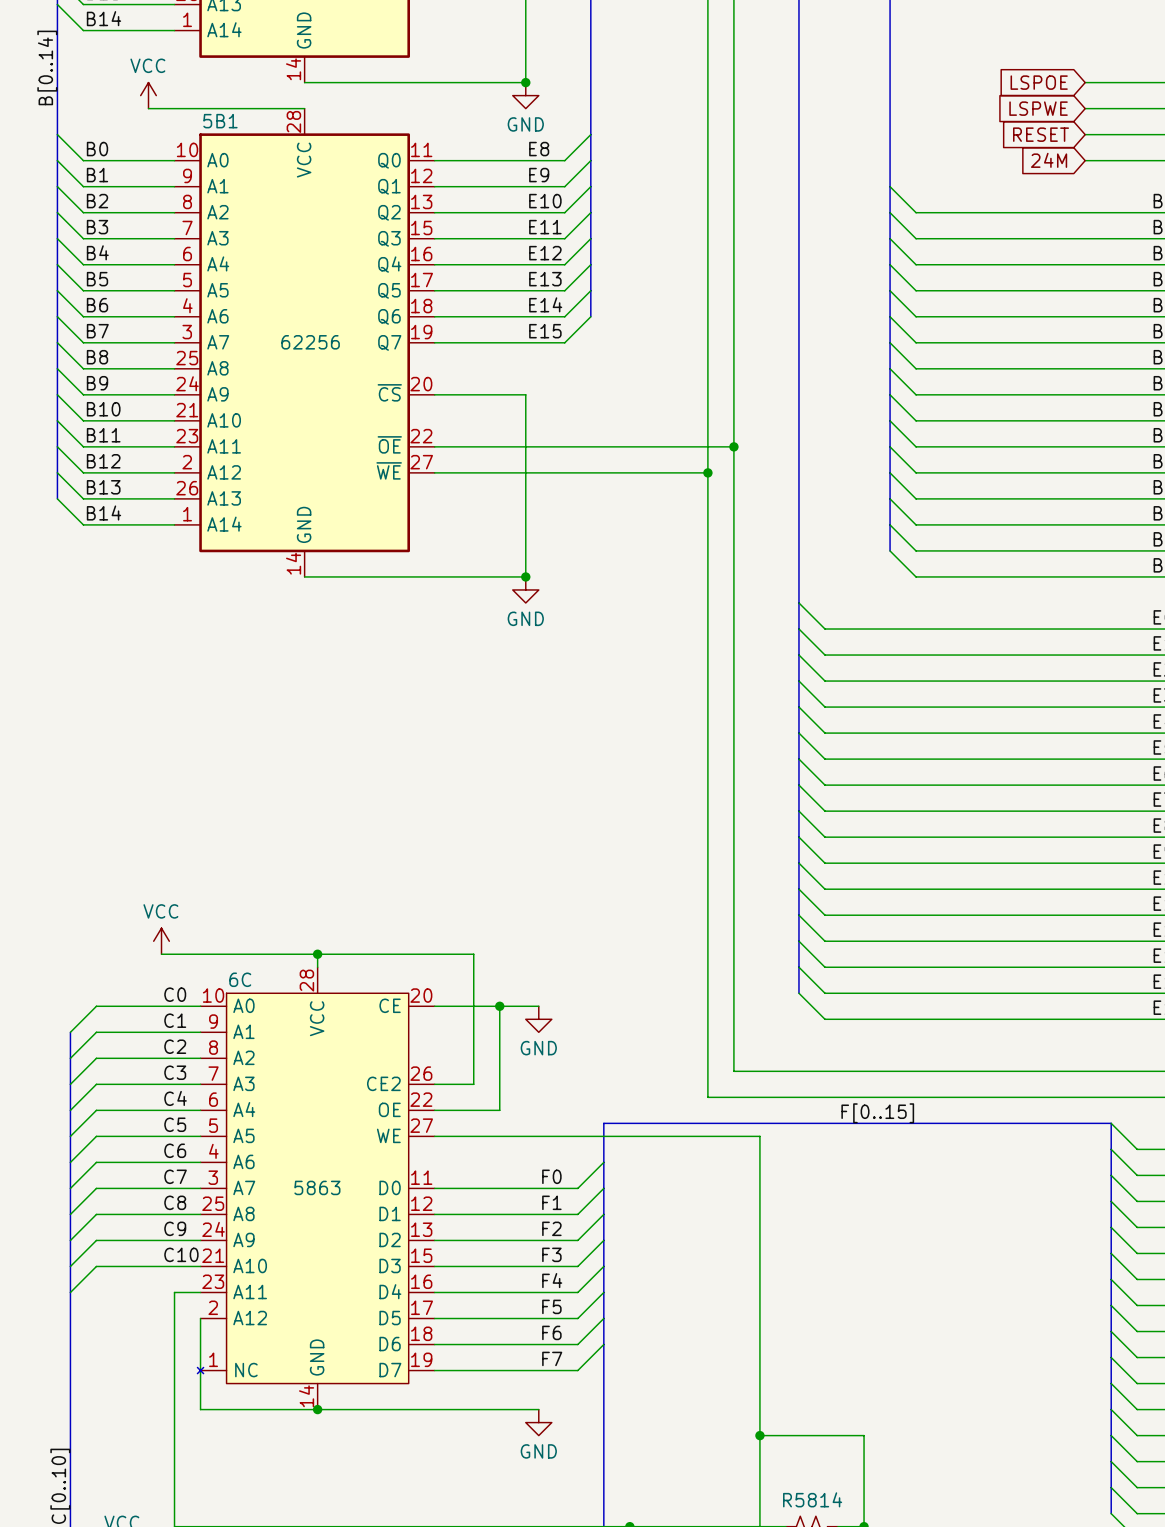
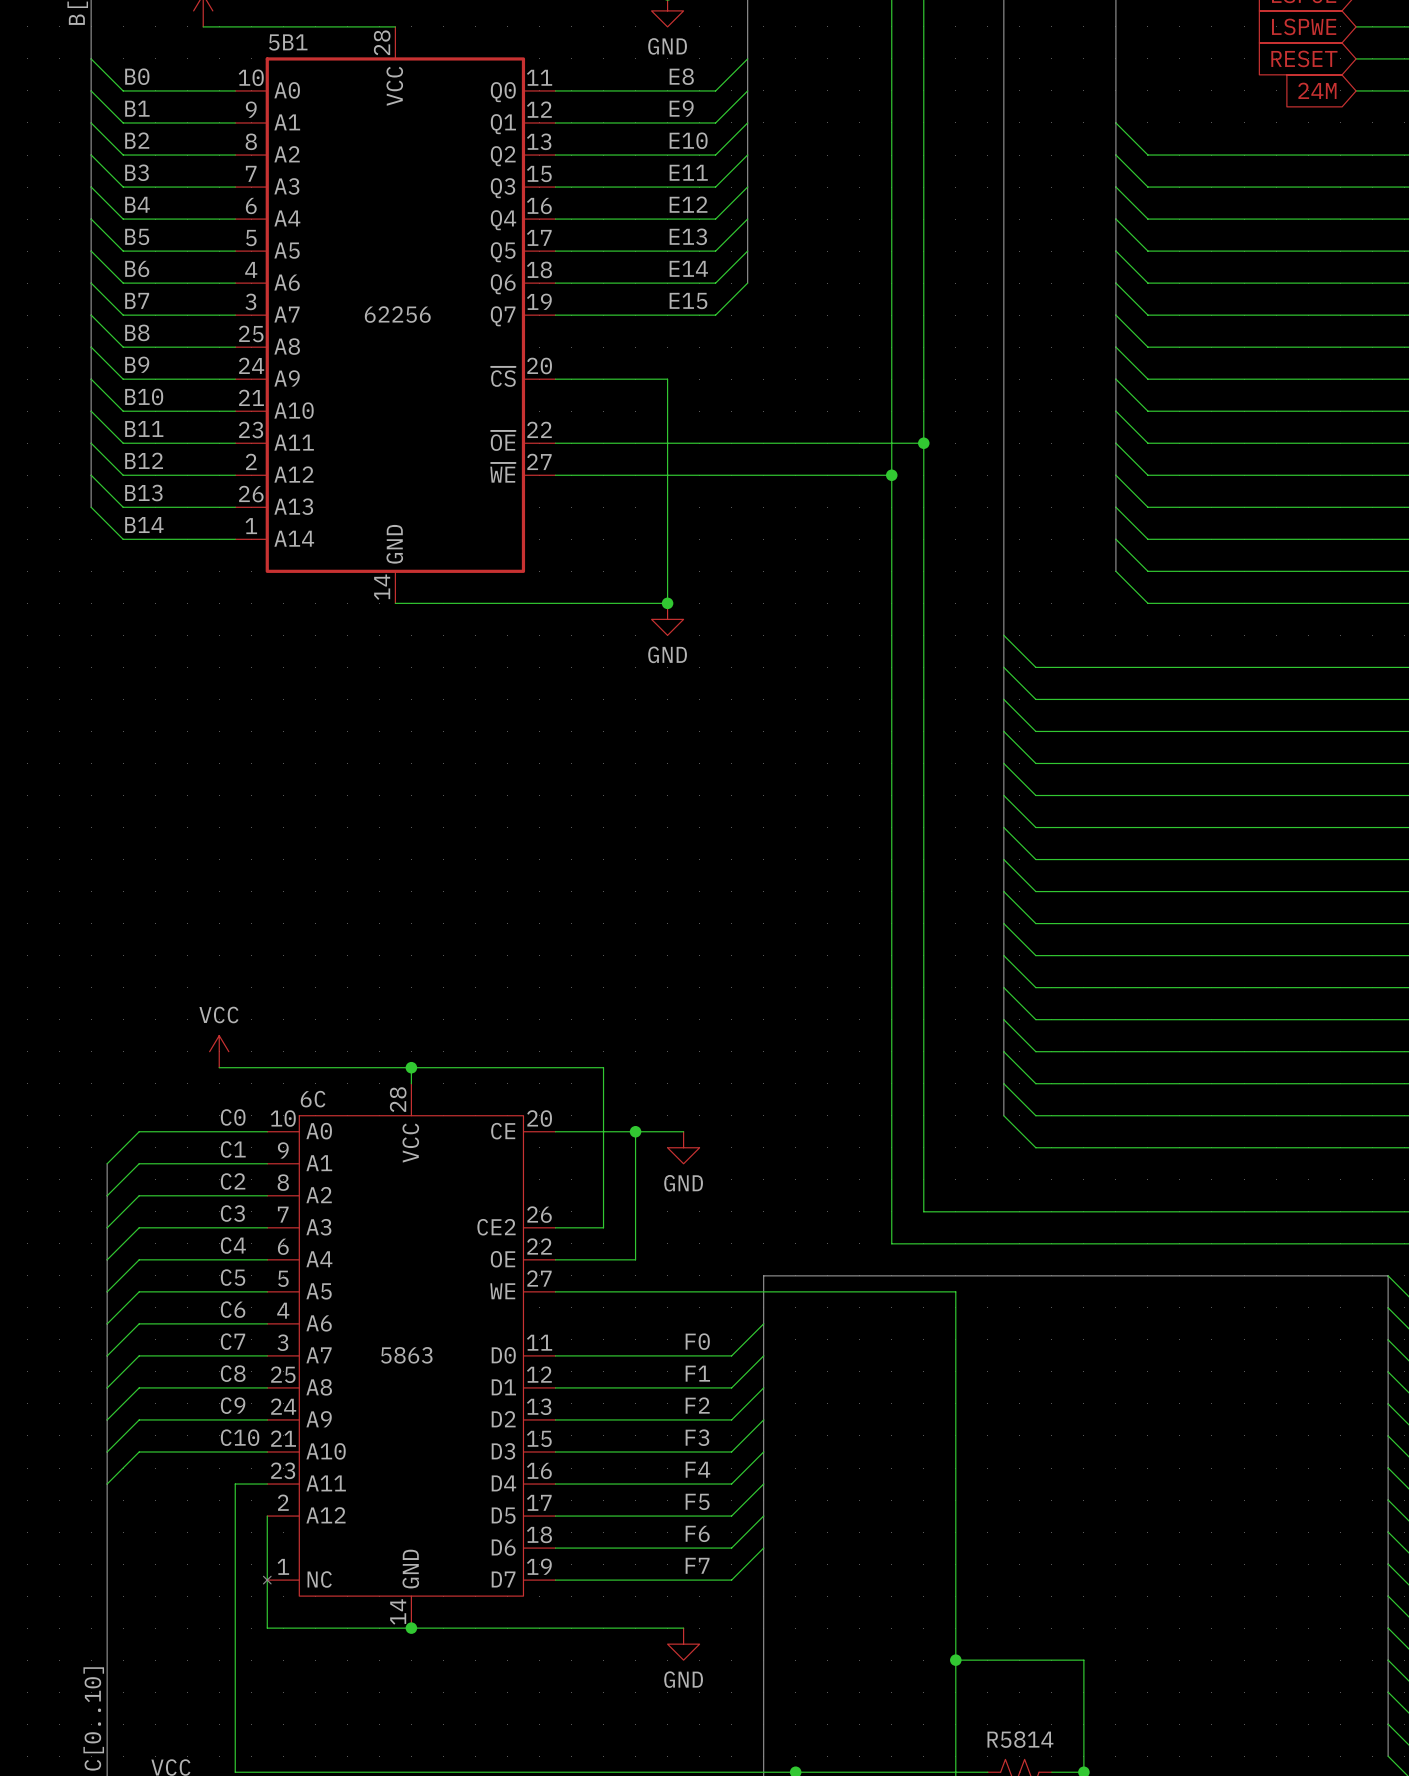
label: F[0..15] (877, 1113) -> none

